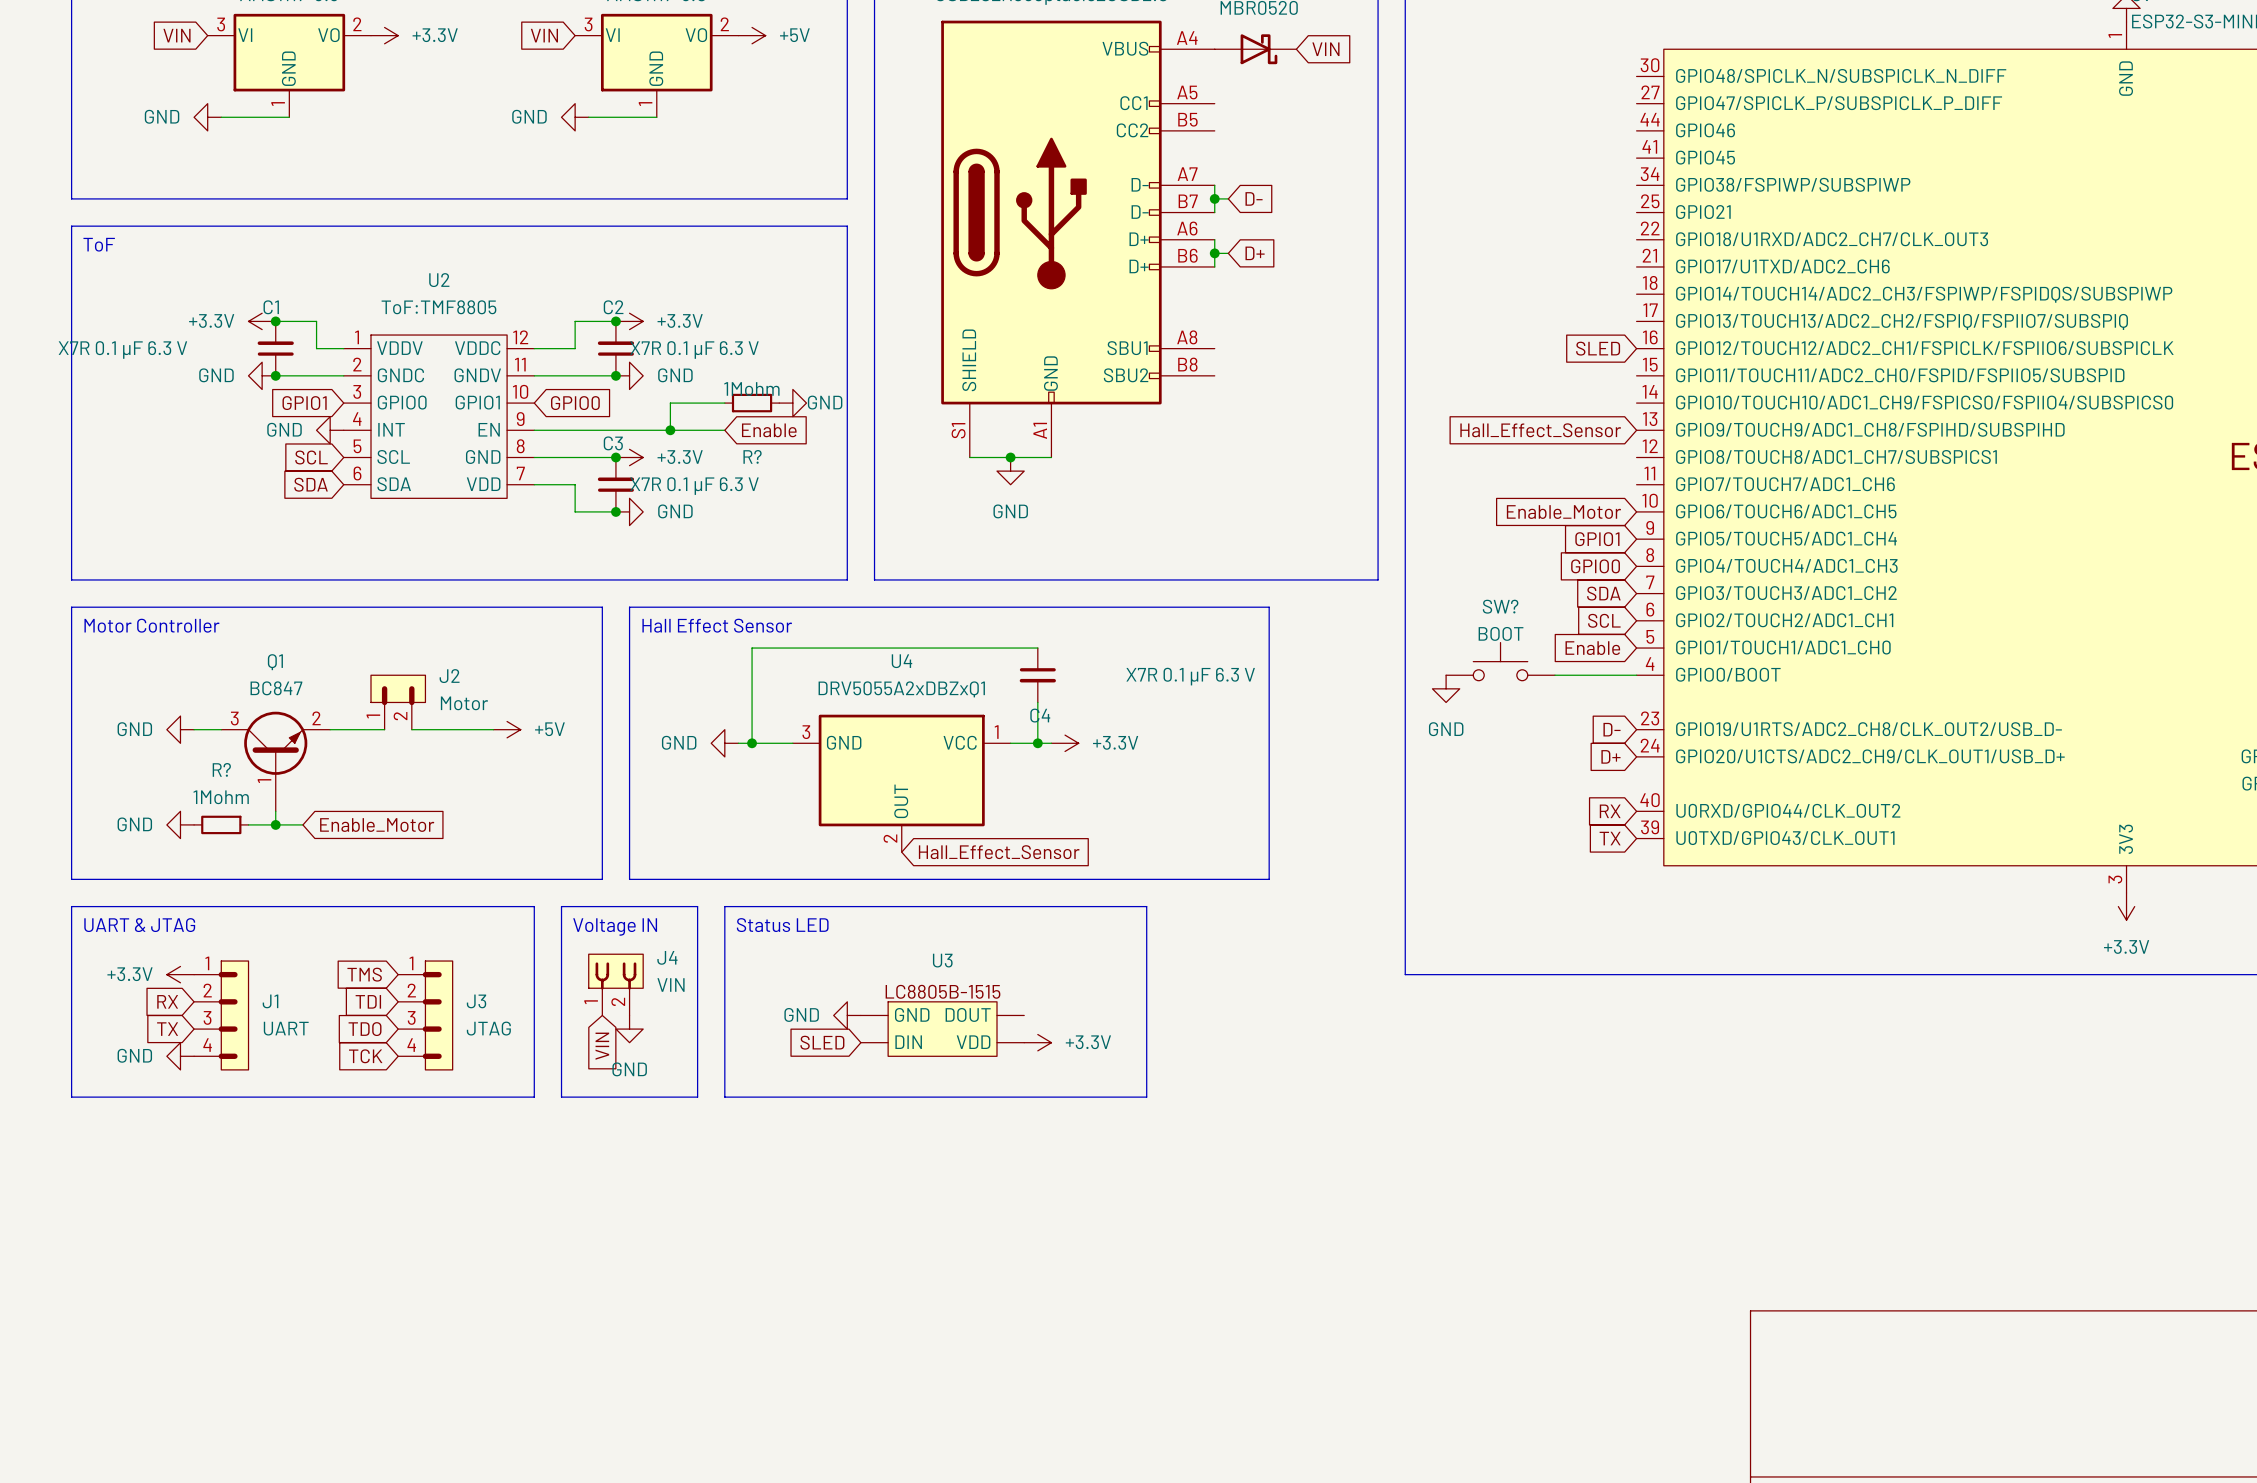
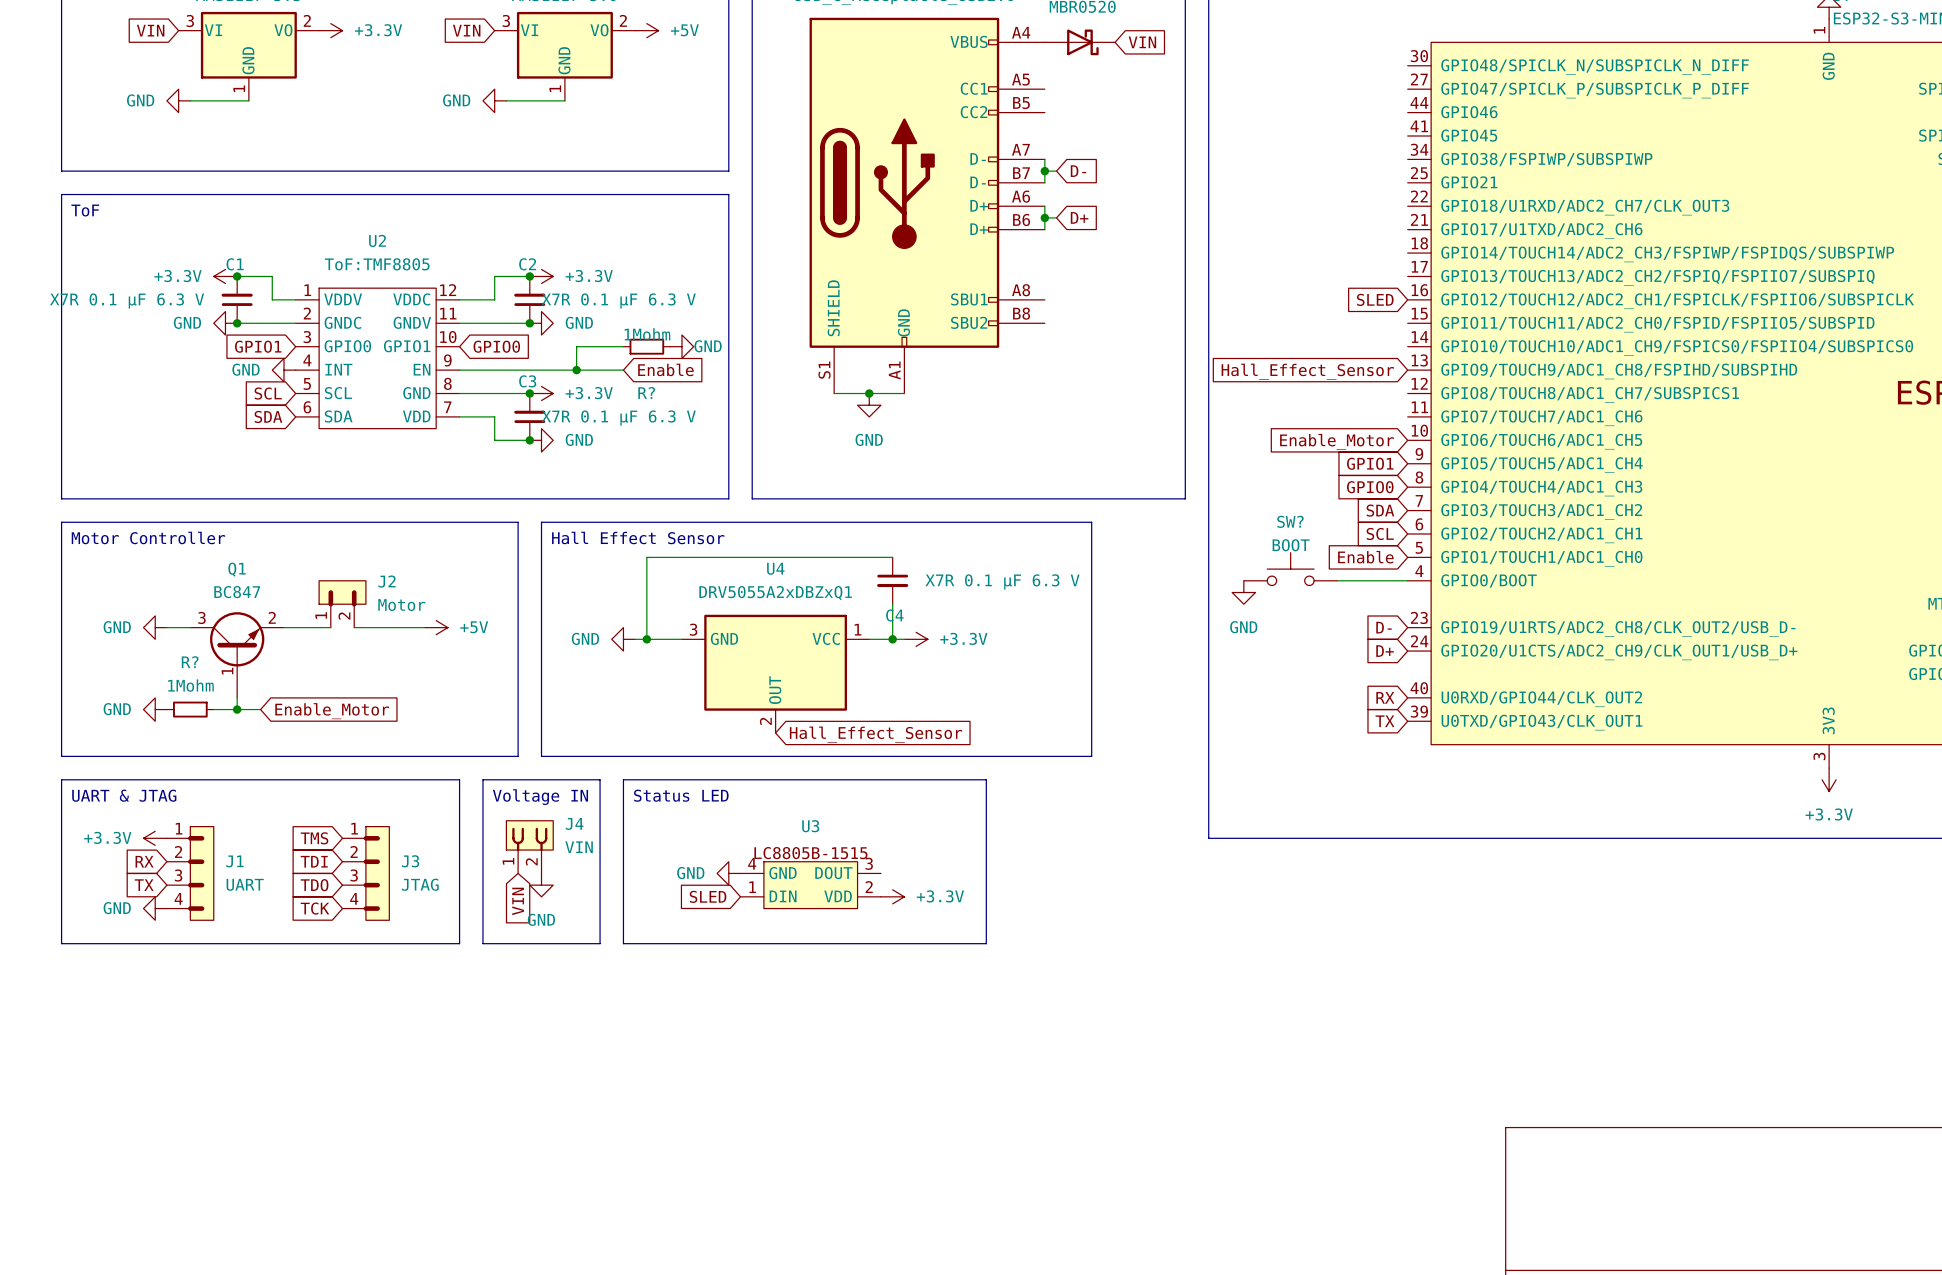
U3 pin number: none -> 4 (752, 863)
U3 pin number: none -> 3 (869, 863)
U3 pin number: none -> 1 (752, 887)
U3 pin number: none -> 2 (869, 887)

